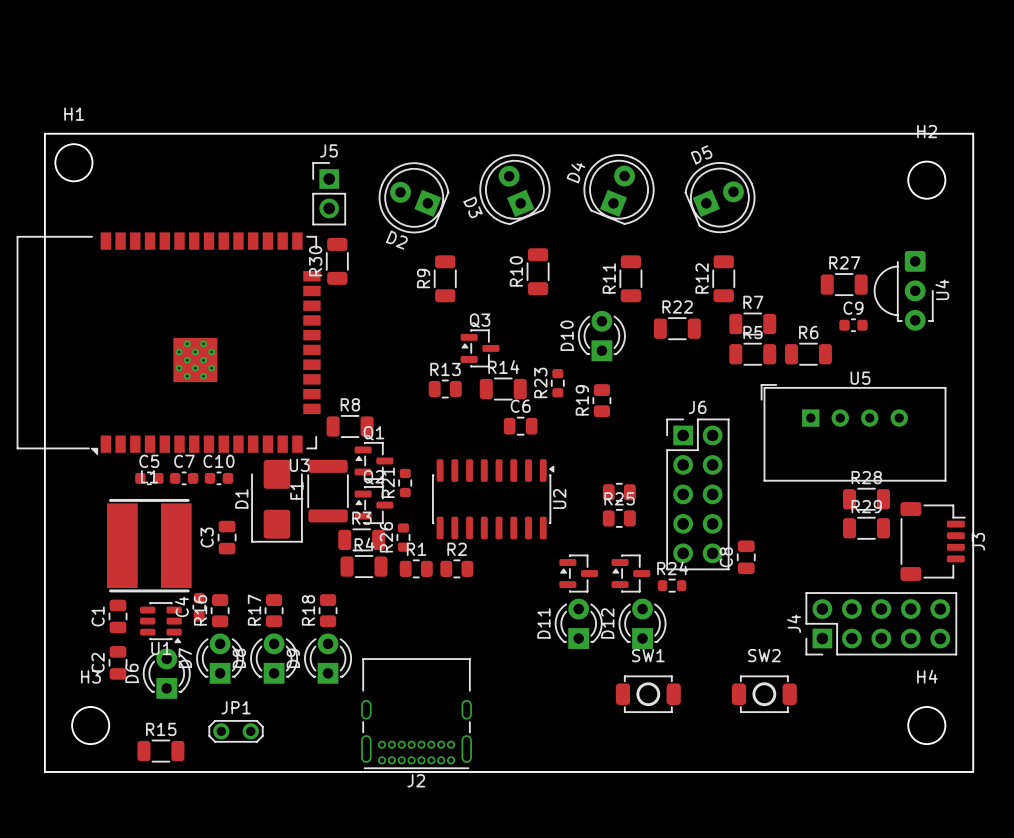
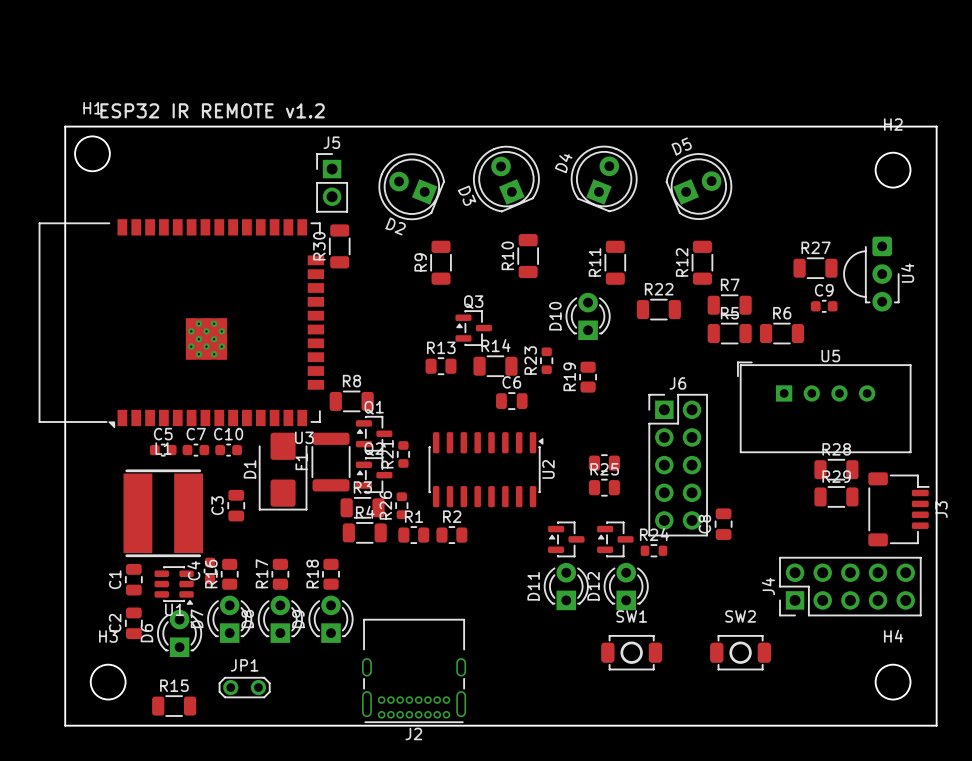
text: none -> ESP32 IR REMOTE v1.2 (212, 110)

